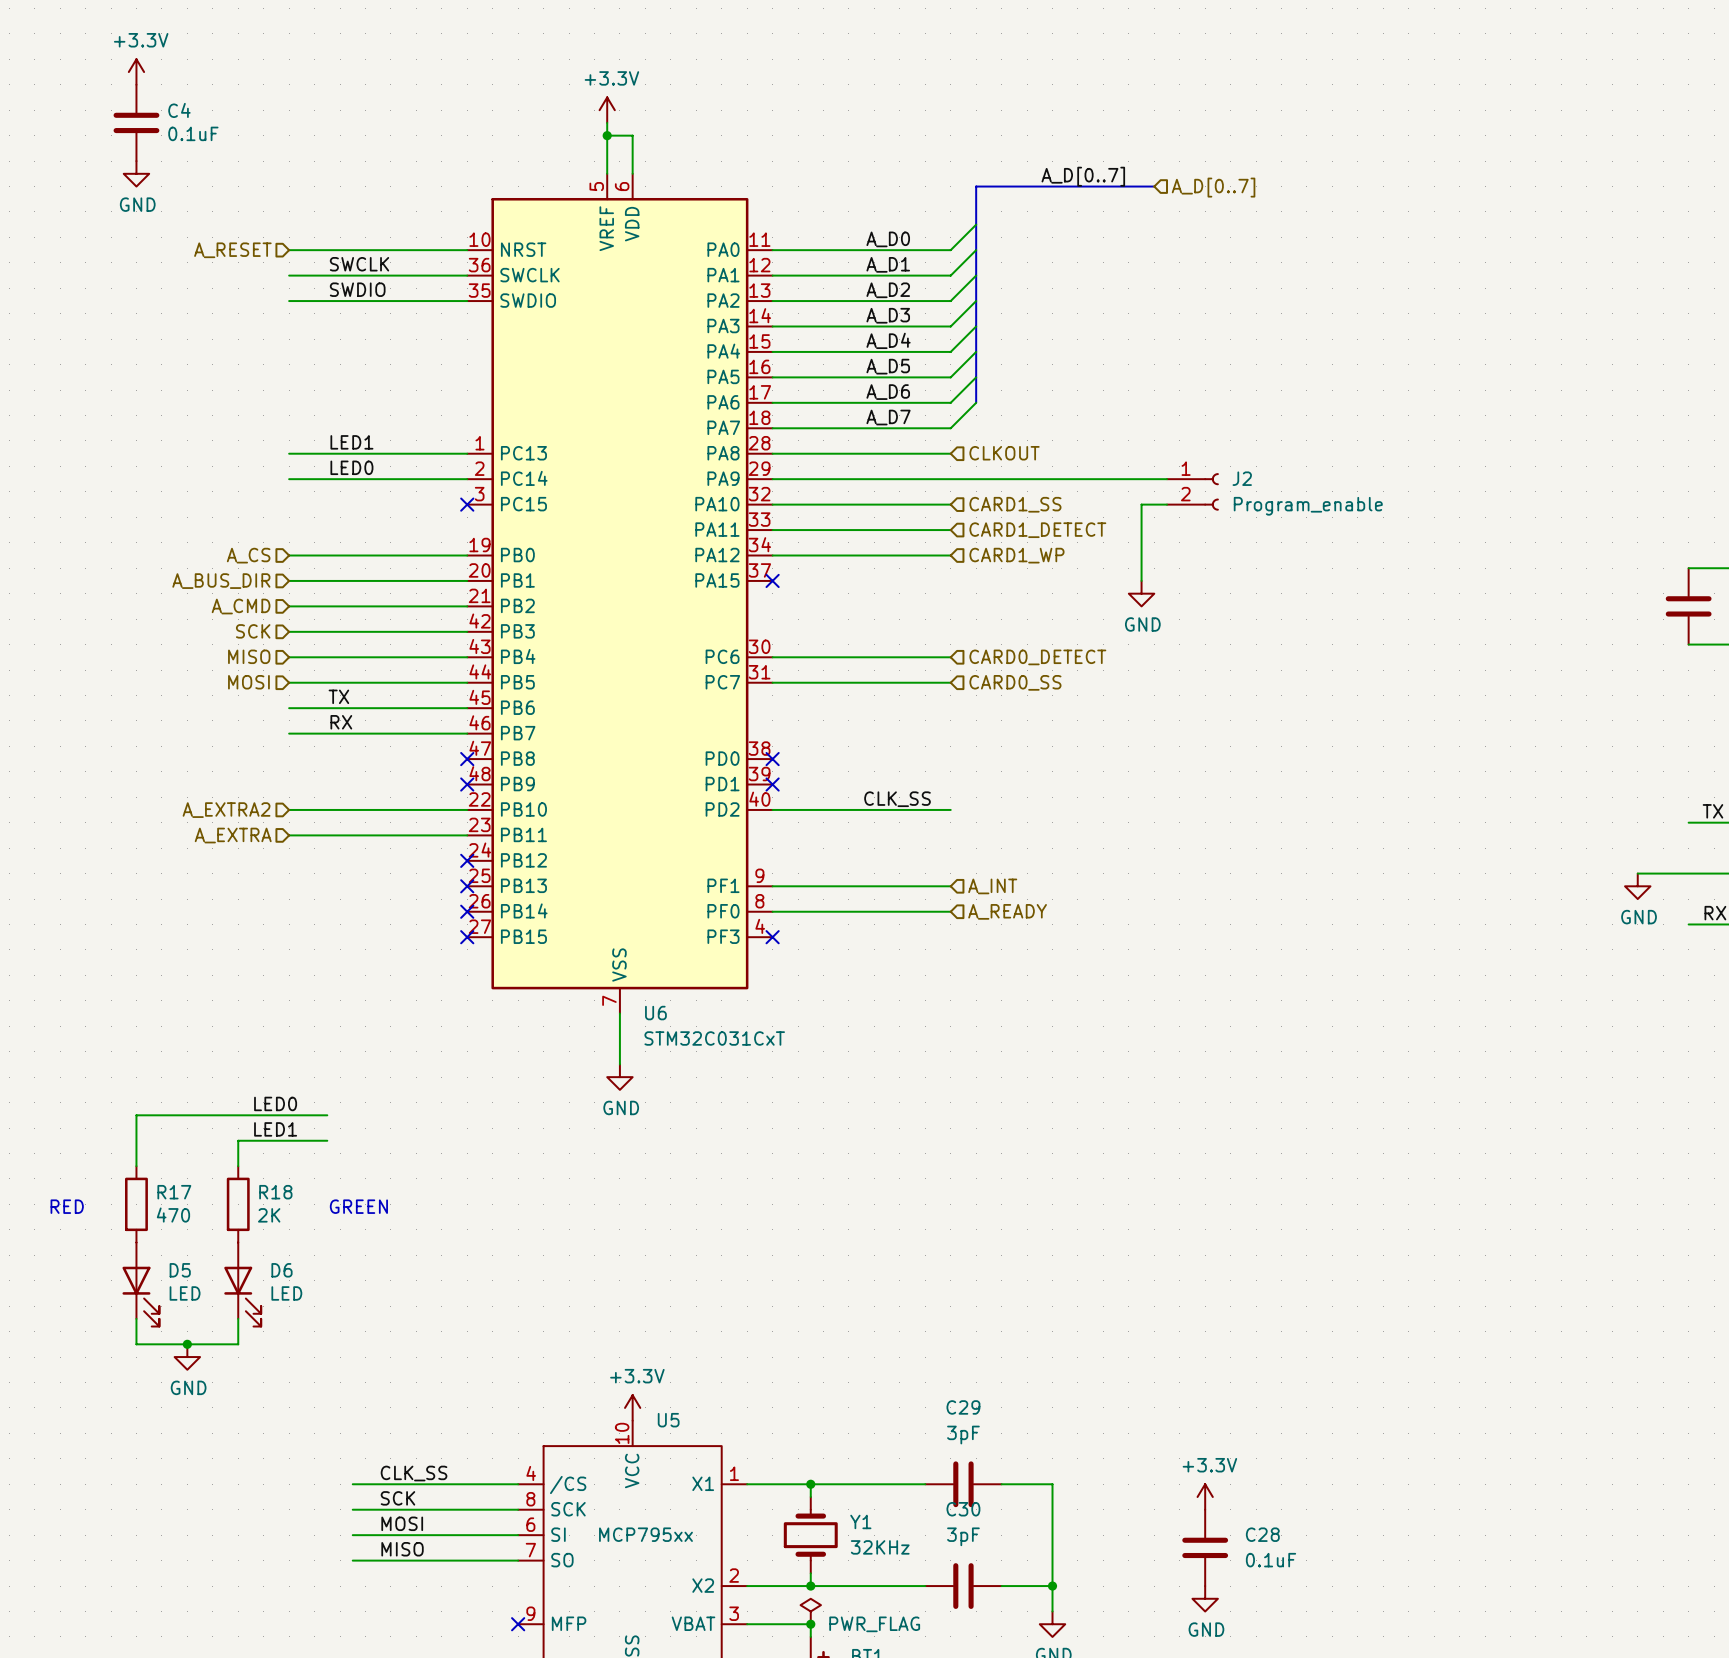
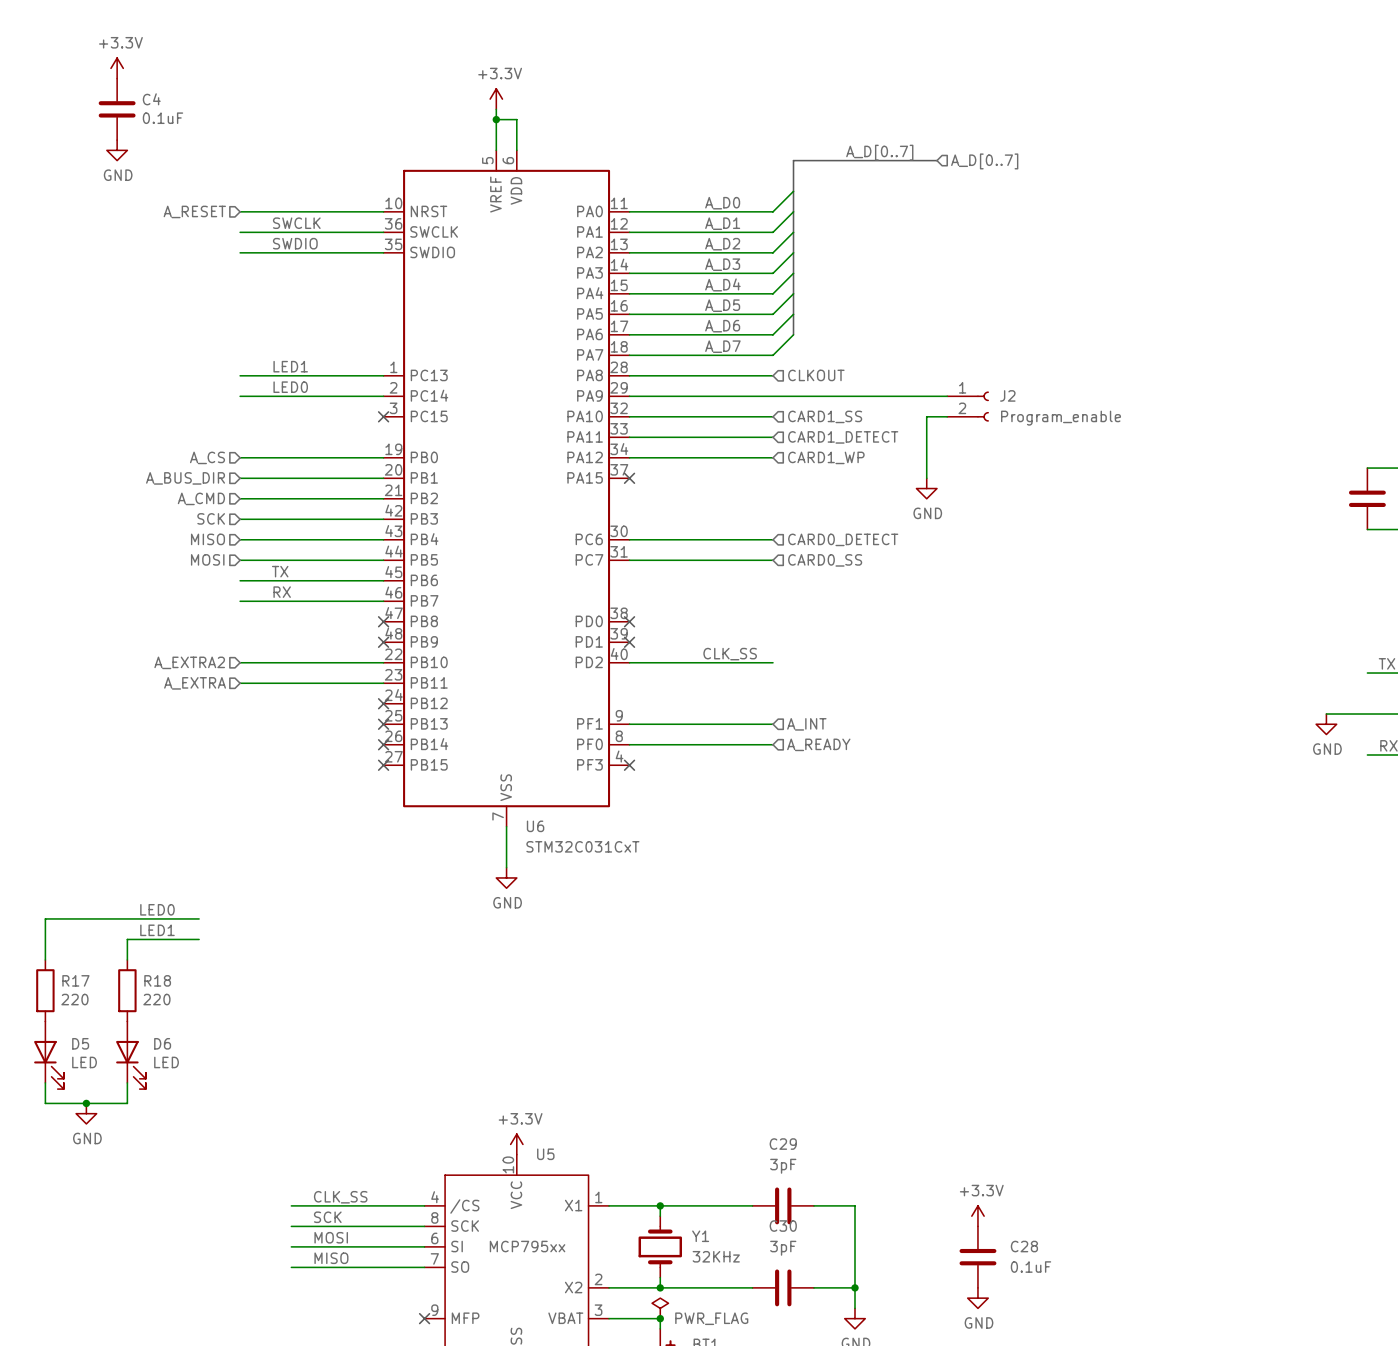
label position: LED0 (275, 1103) -> LED0 (157, 909)
wire: (327, 1115) (136, 1115) (136, 1166) -> (199, 918) (45, 918) (45, 959)
label position: LED1 (275, 1129) -> LED1 (157, 930)
wire: (327, 1140) (238, 1140) (238, 1166) -> (199, 939) (127, 939) (127, 959)
R17 position: (136, 1204) -> (45, 990)
R18 position: (238, 1204) -> (127, 990)
text: RED (67, 1206) -> none
text: GREEN (358, 1206) -> none
R17 value: 470 (173, 1215) -> 220 (74, 999)
R18 value: 2K (269, 1215) -> 220 (156, 999)
D5 position: (140, 1284) -> (48, 1055)
D6 position: (242, 1284) -> (130, 1055)
wire: (136, 1318) (136, 1344) (238, 1344) (238, 1318) -> (45, 1082) (45, 1103) (127, 1103) (127, 1082)
junction: (187, 1344) -> none
junction: none -> (86, 1103)
power symbol position: GND (187, 1357) -> GND (86, 1113)

